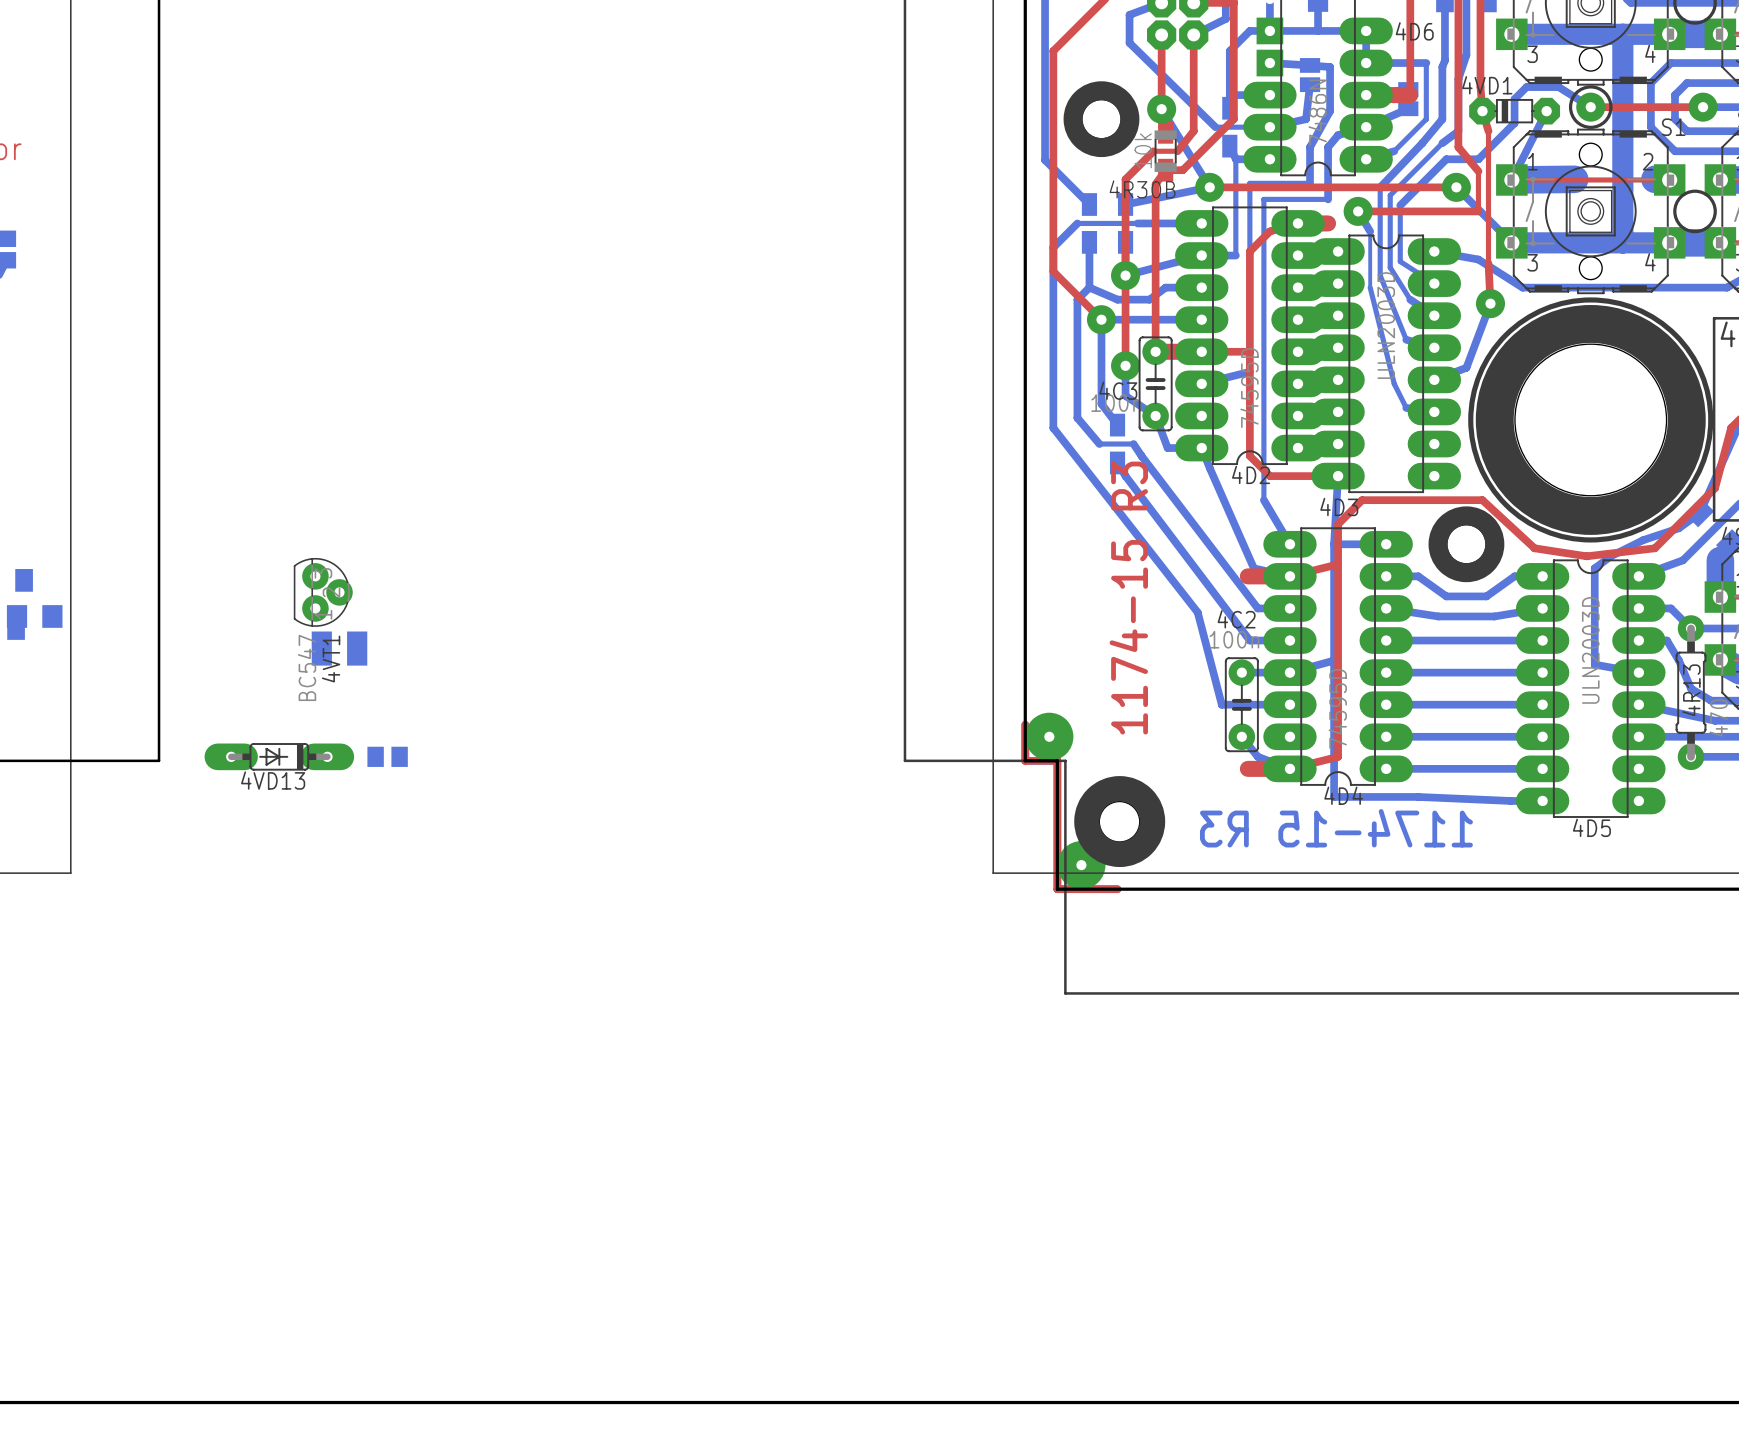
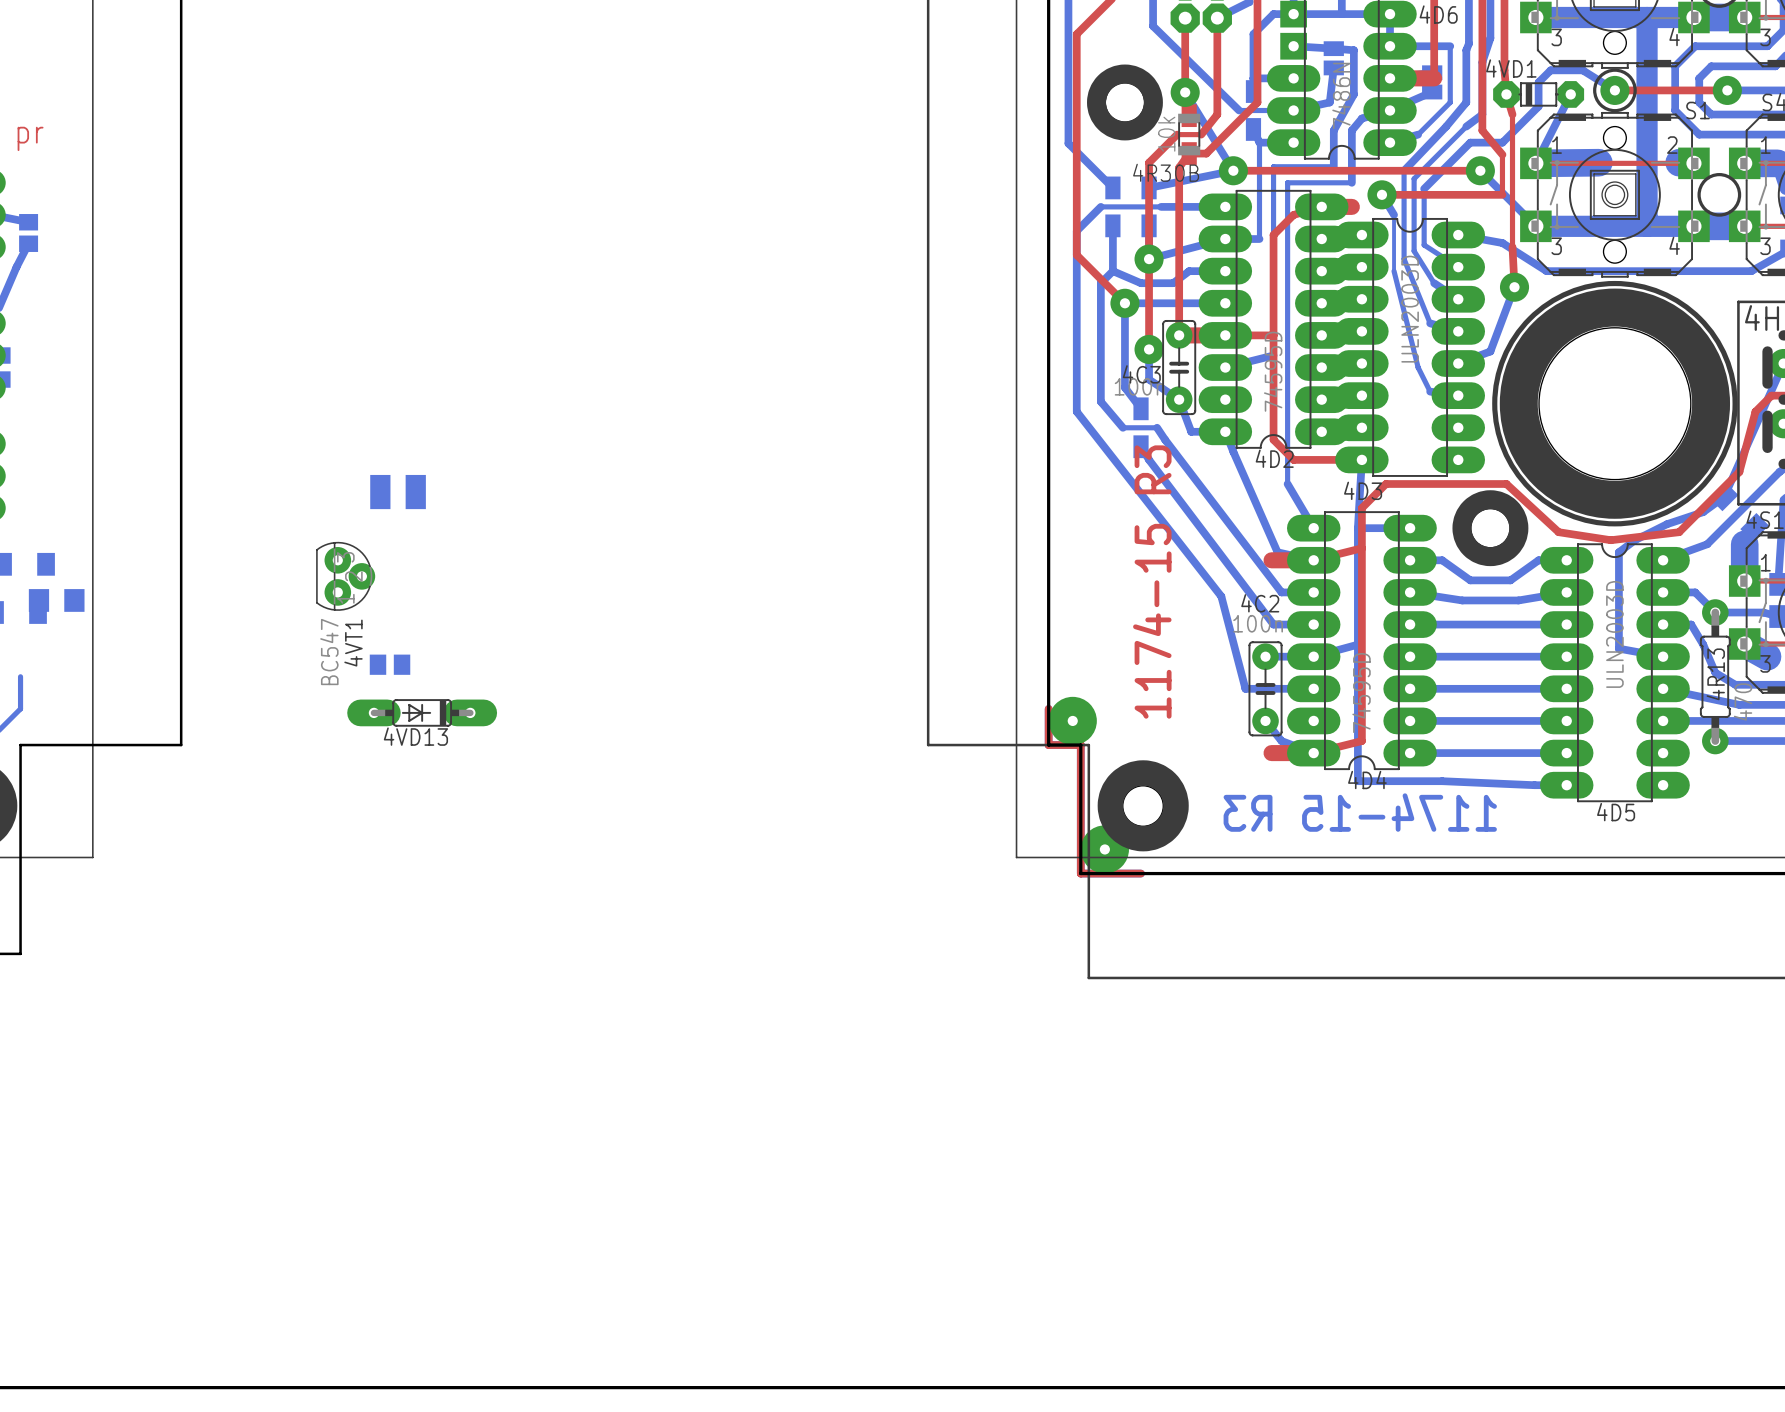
part position: (339, 648) -> (398, 492)
4VD13 position: (279, 756) -> (422, 712)
part position: (387, 756) -> (390, 664)

